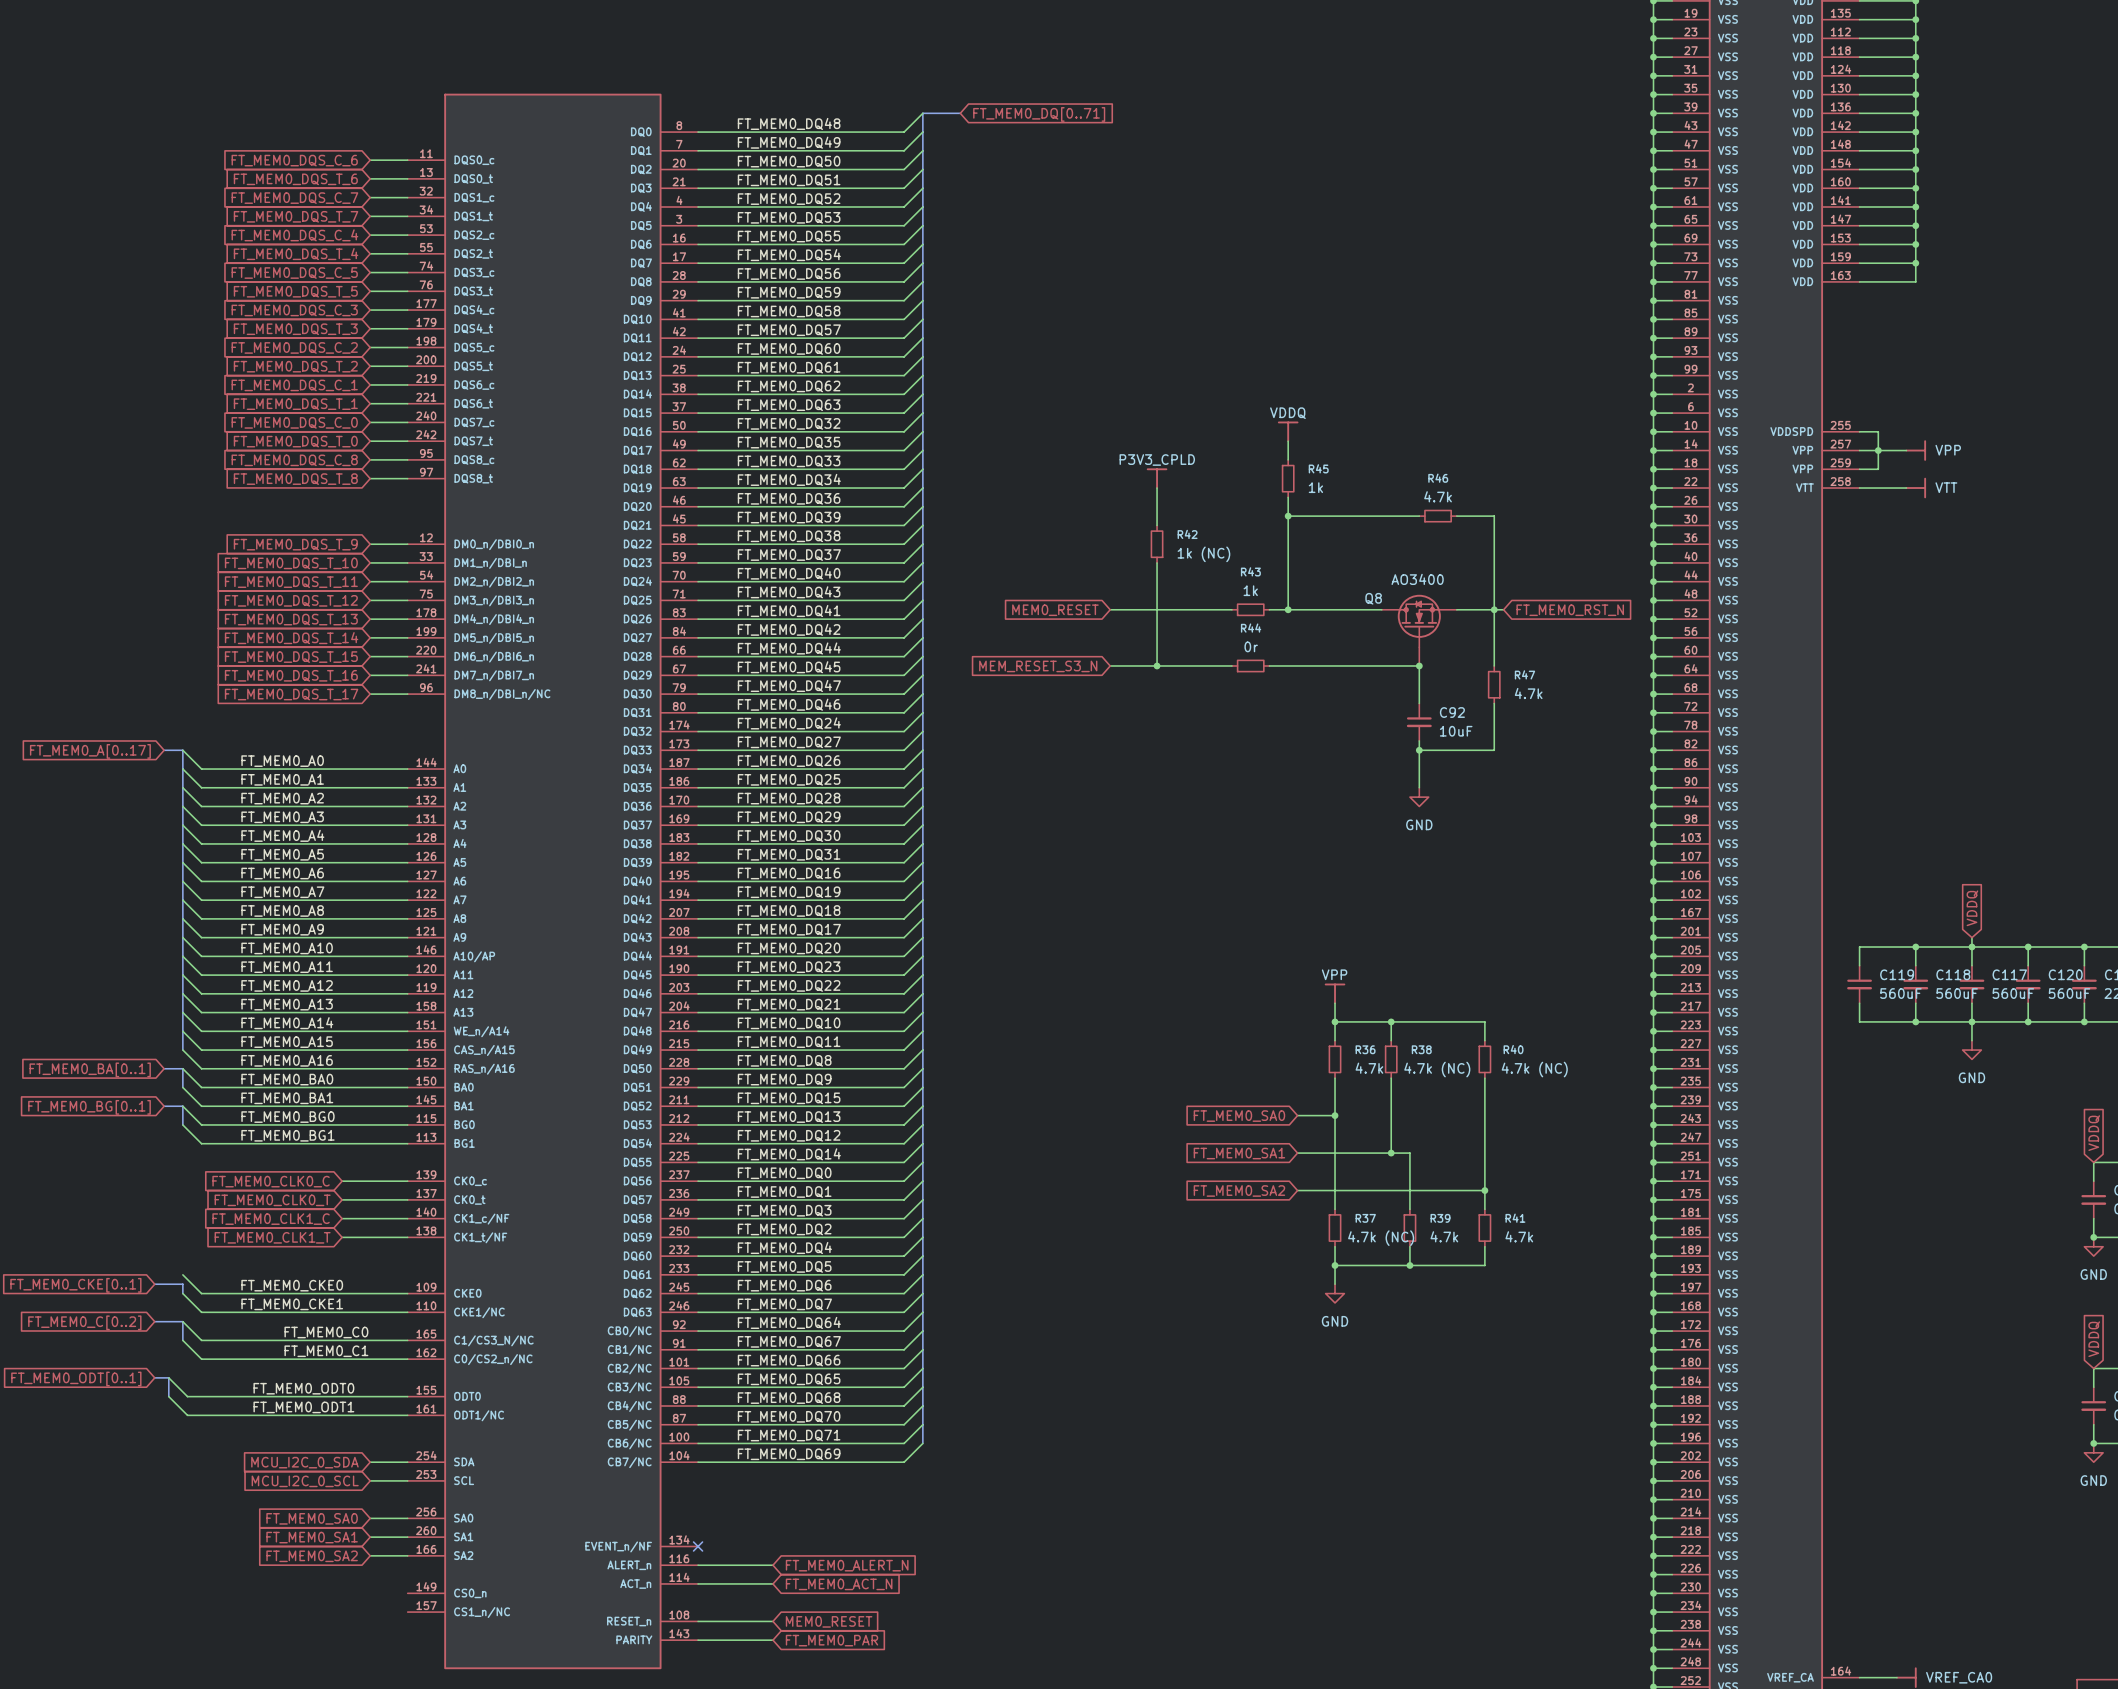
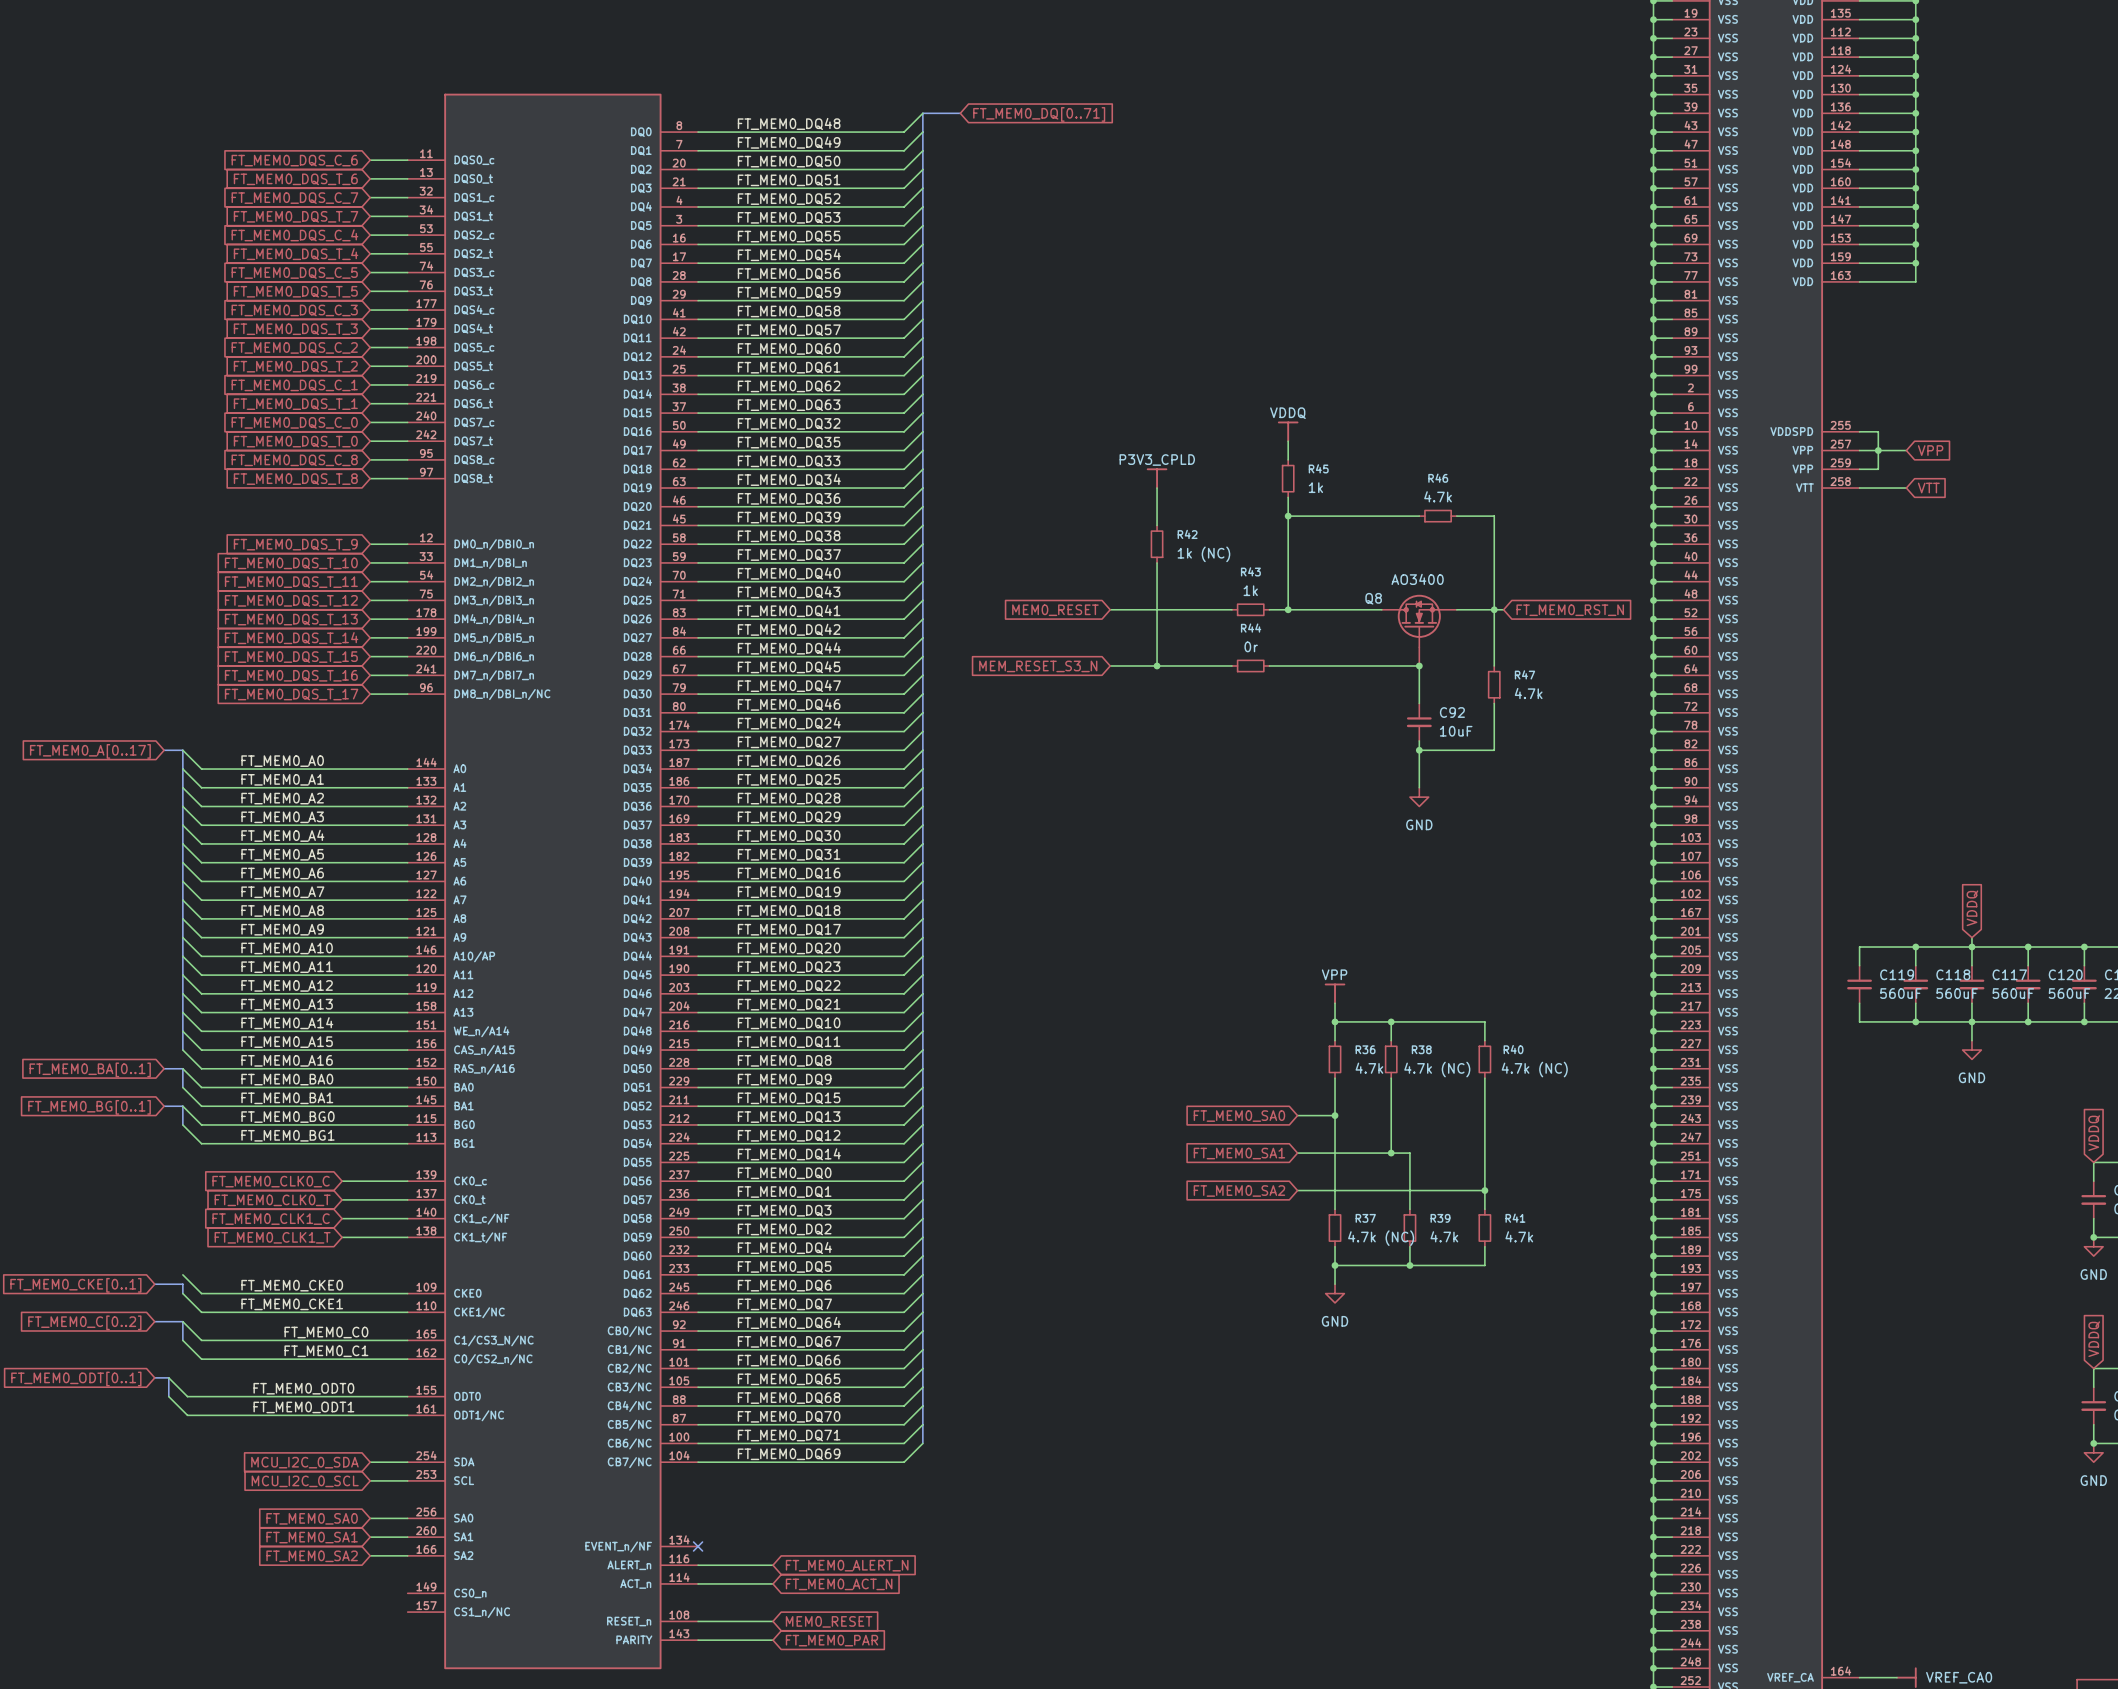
power symbol: VPP (1915, 450) -> none
global label: none -> VPP (1930, 450)
power symbol: VTT (1915, 488) -> none
global label: none -> VTT (1928, 488)

